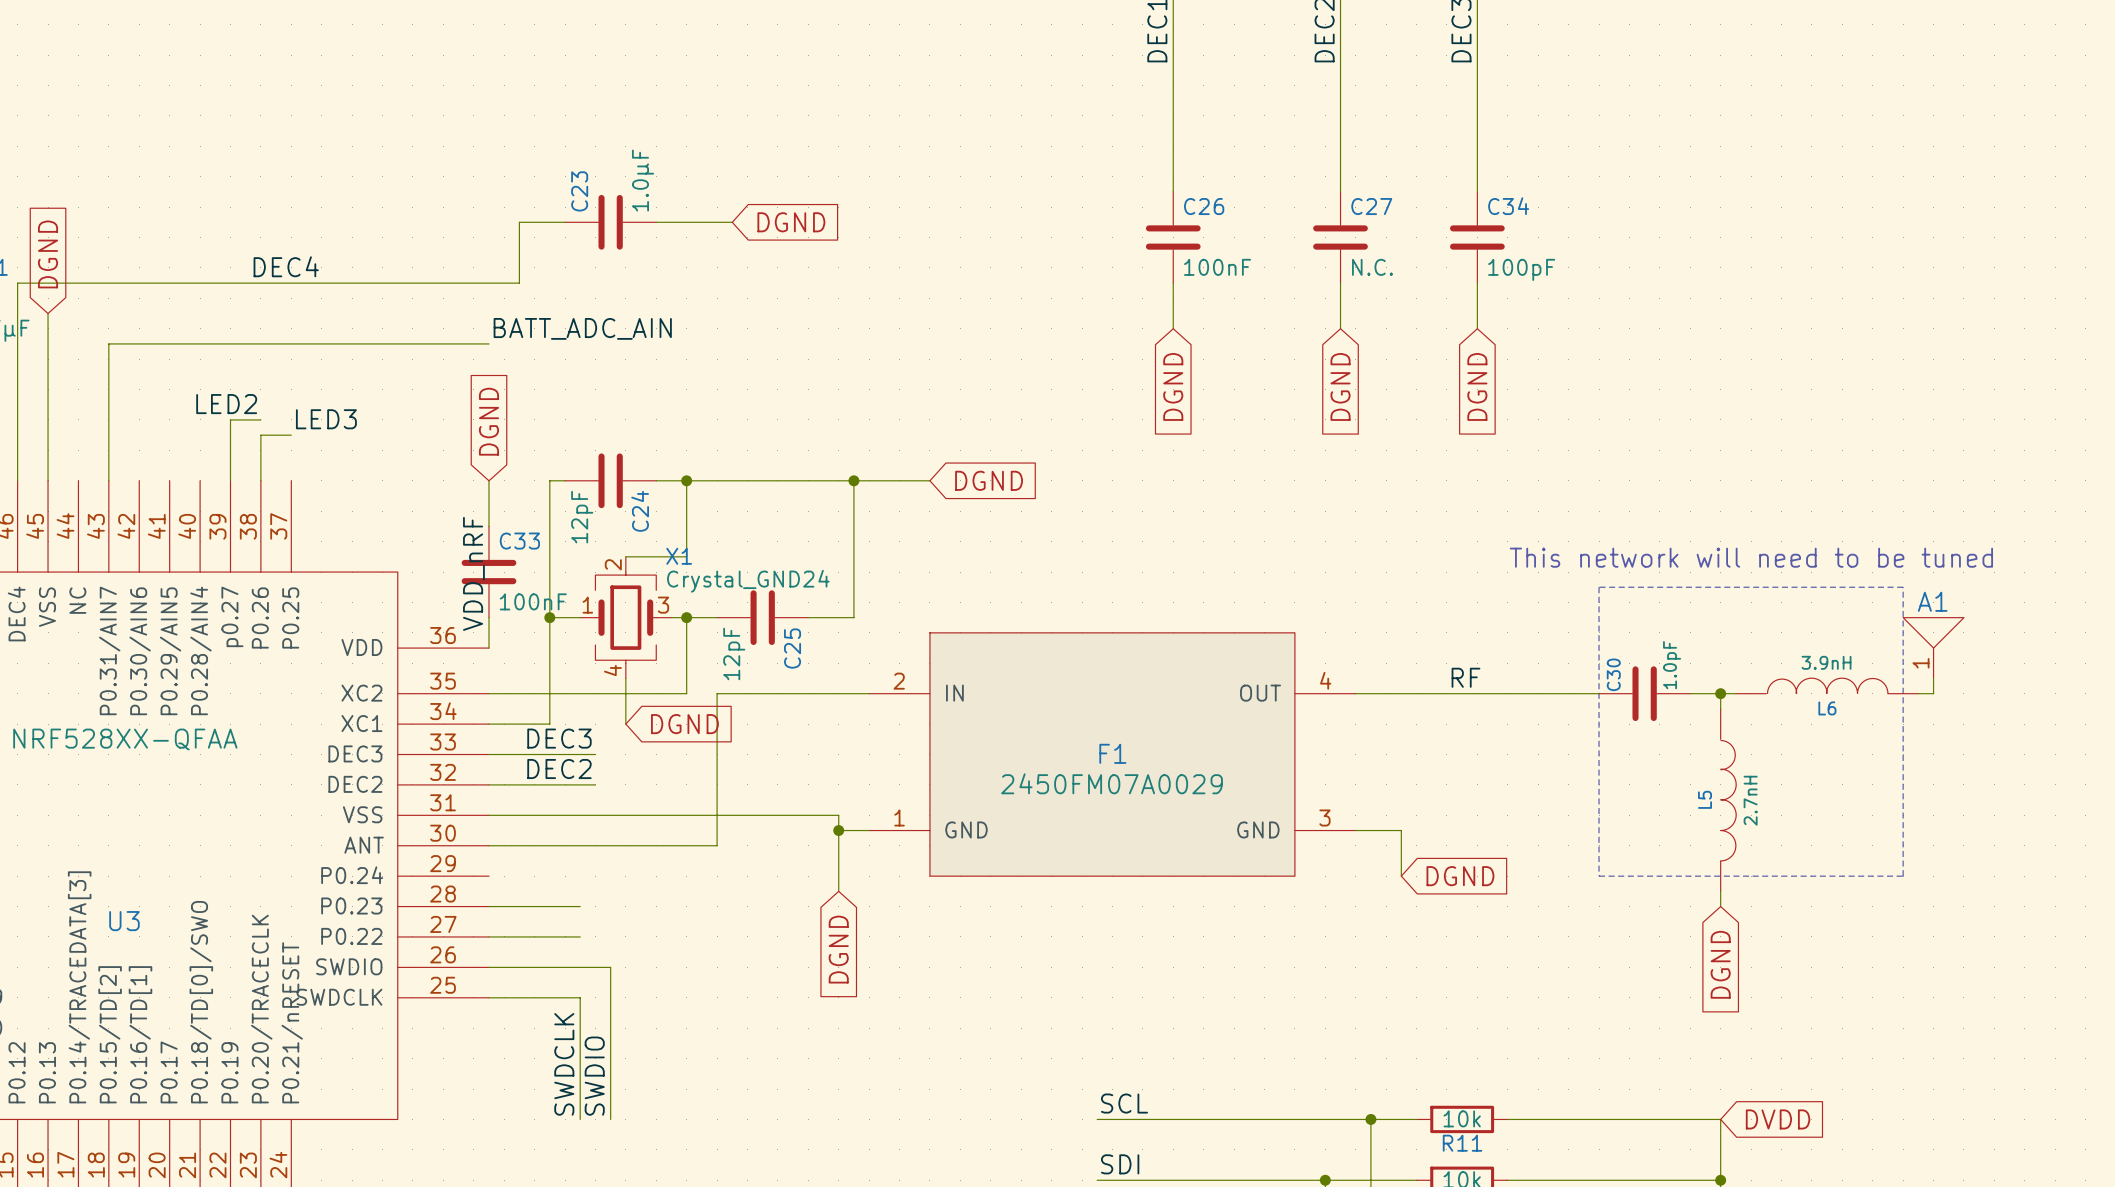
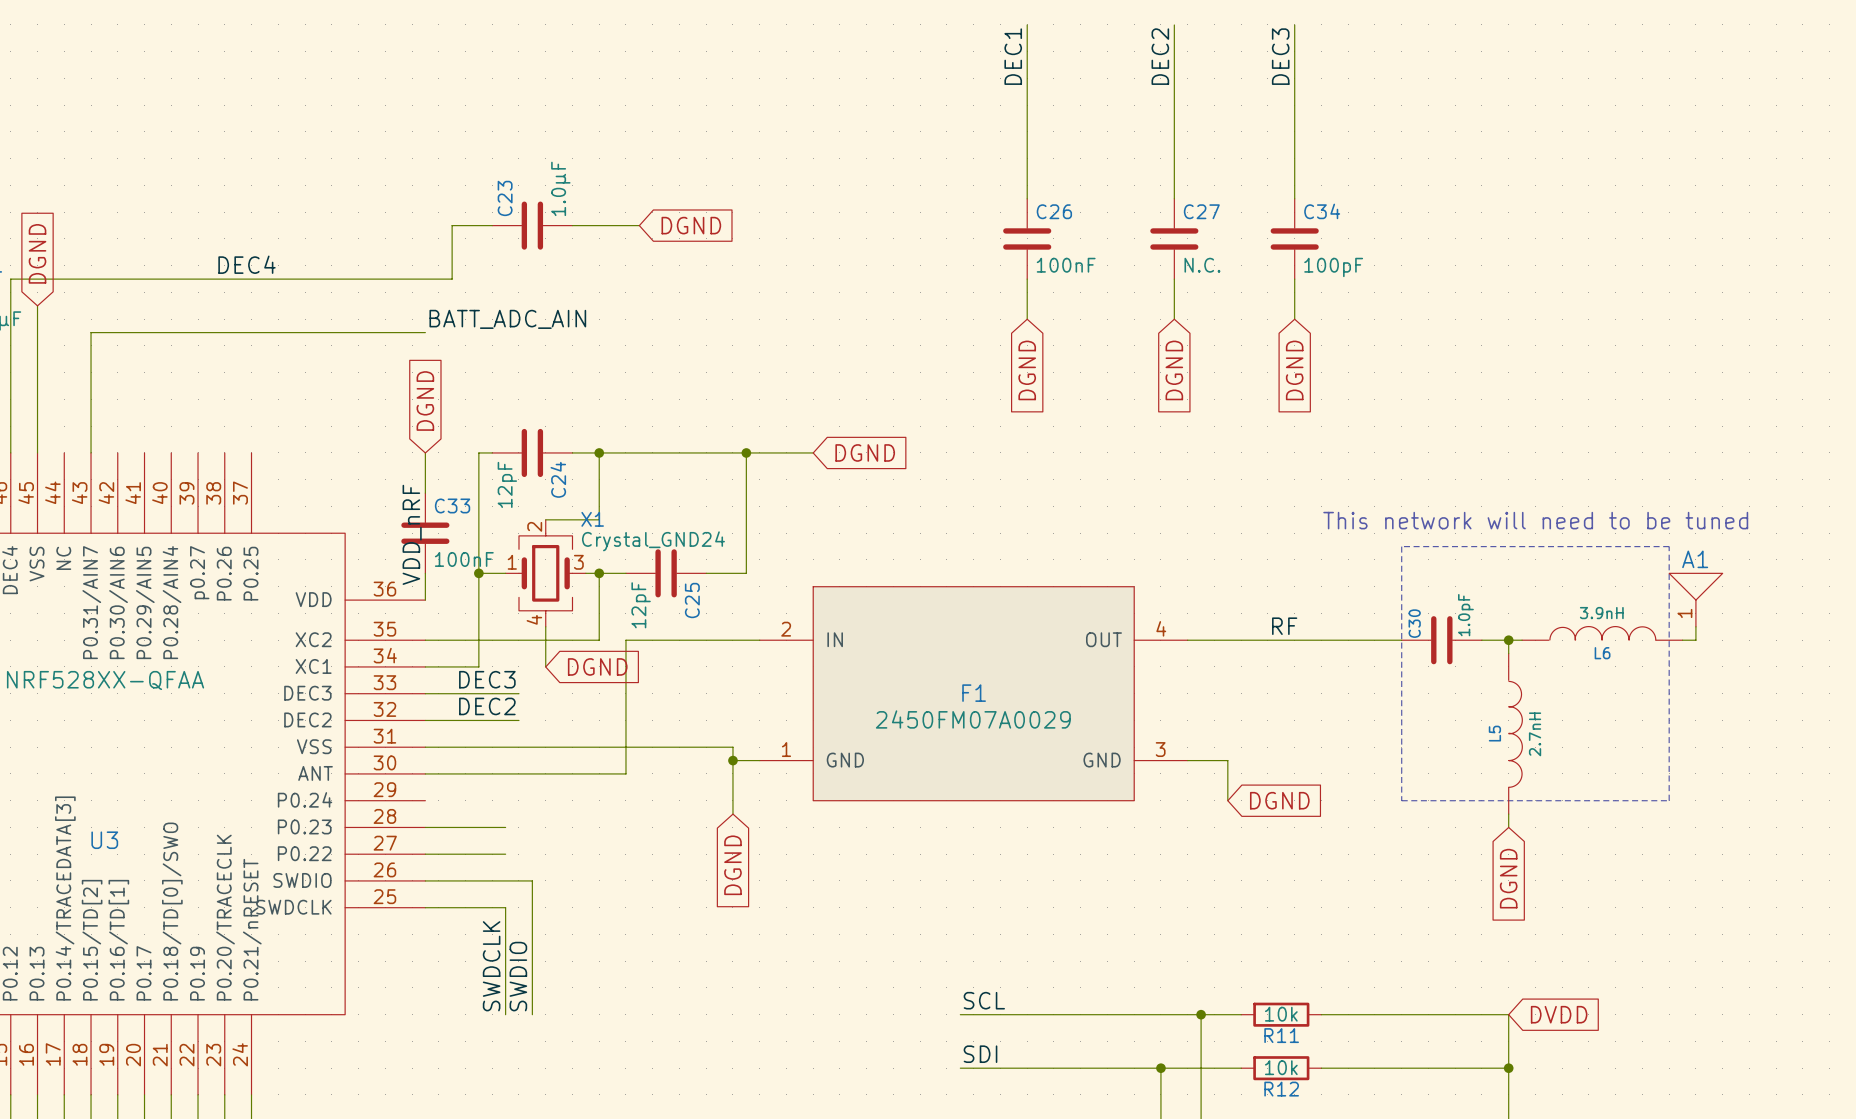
label: LED2 (226, 404) -> none
wire: (260, 419) (230, 419) (230, 480) -> none
label: LED3 (326, 419) -> none
wire: (291, 435) (260, 435) (260, 480) -> none

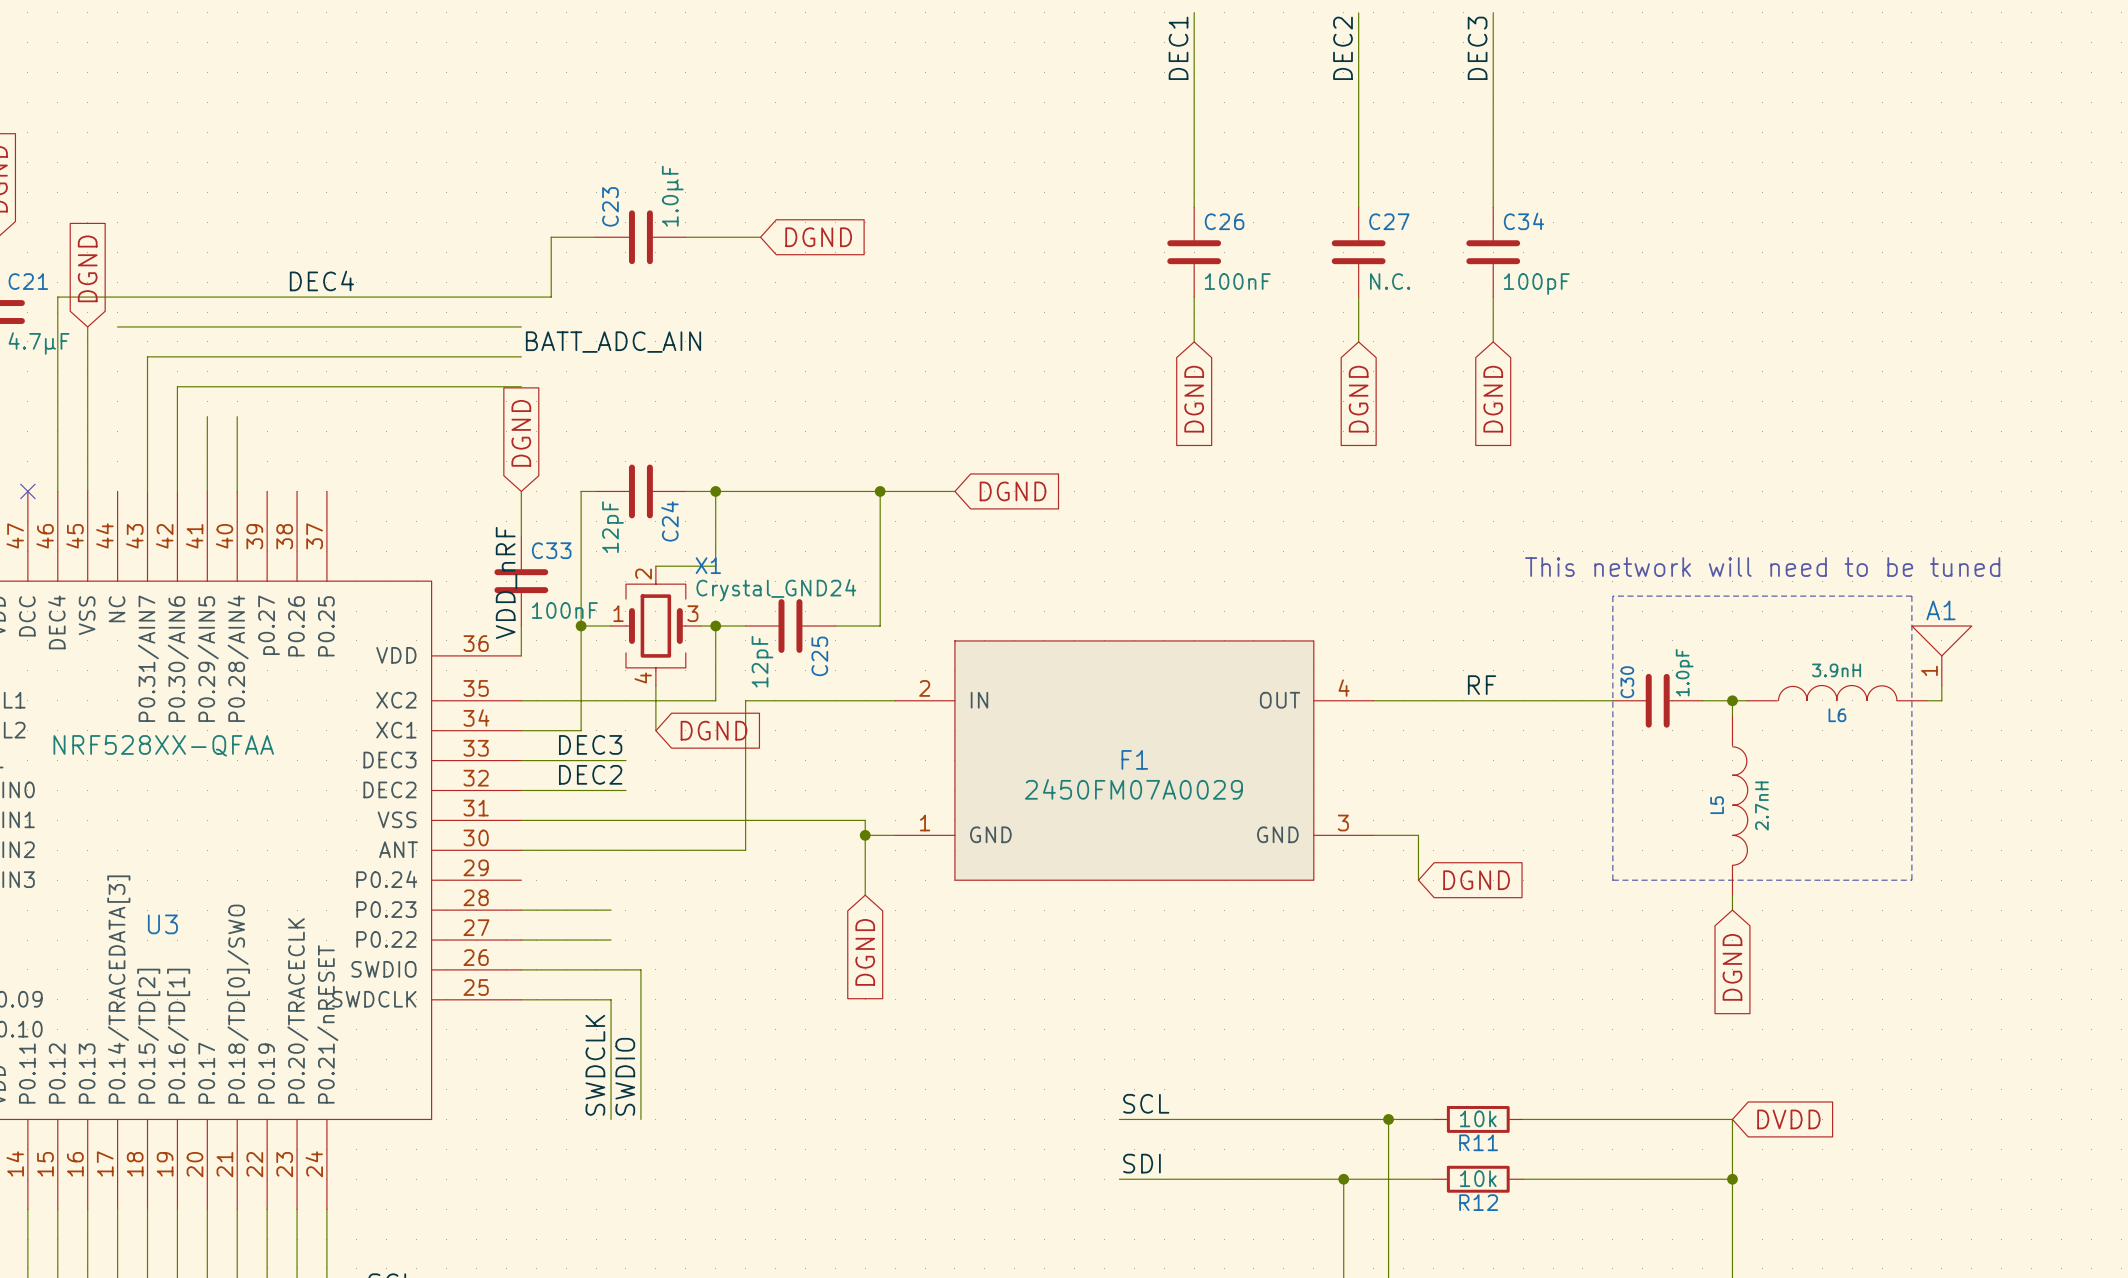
wire: none -> (117, 326) (521, 326)
wire: none -> (521, 386) (177, 386) (177, 491)
wire: none -> (207, 416) (207, 491)
wire: none -> (237, 416) (237, 491)

